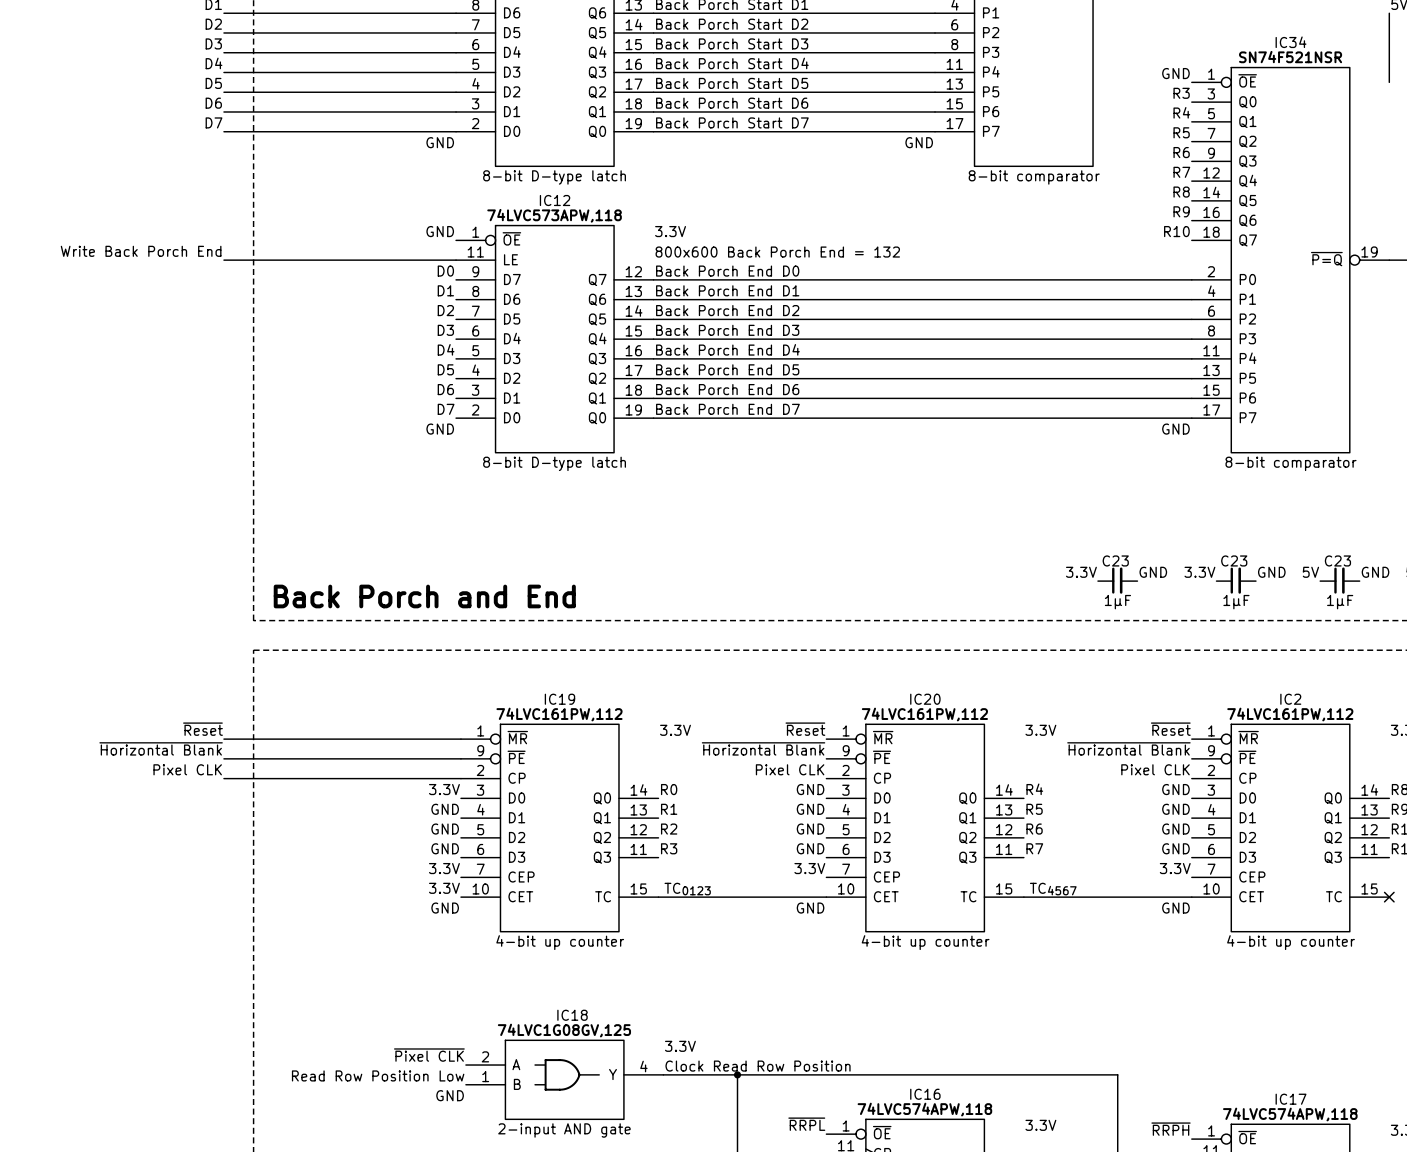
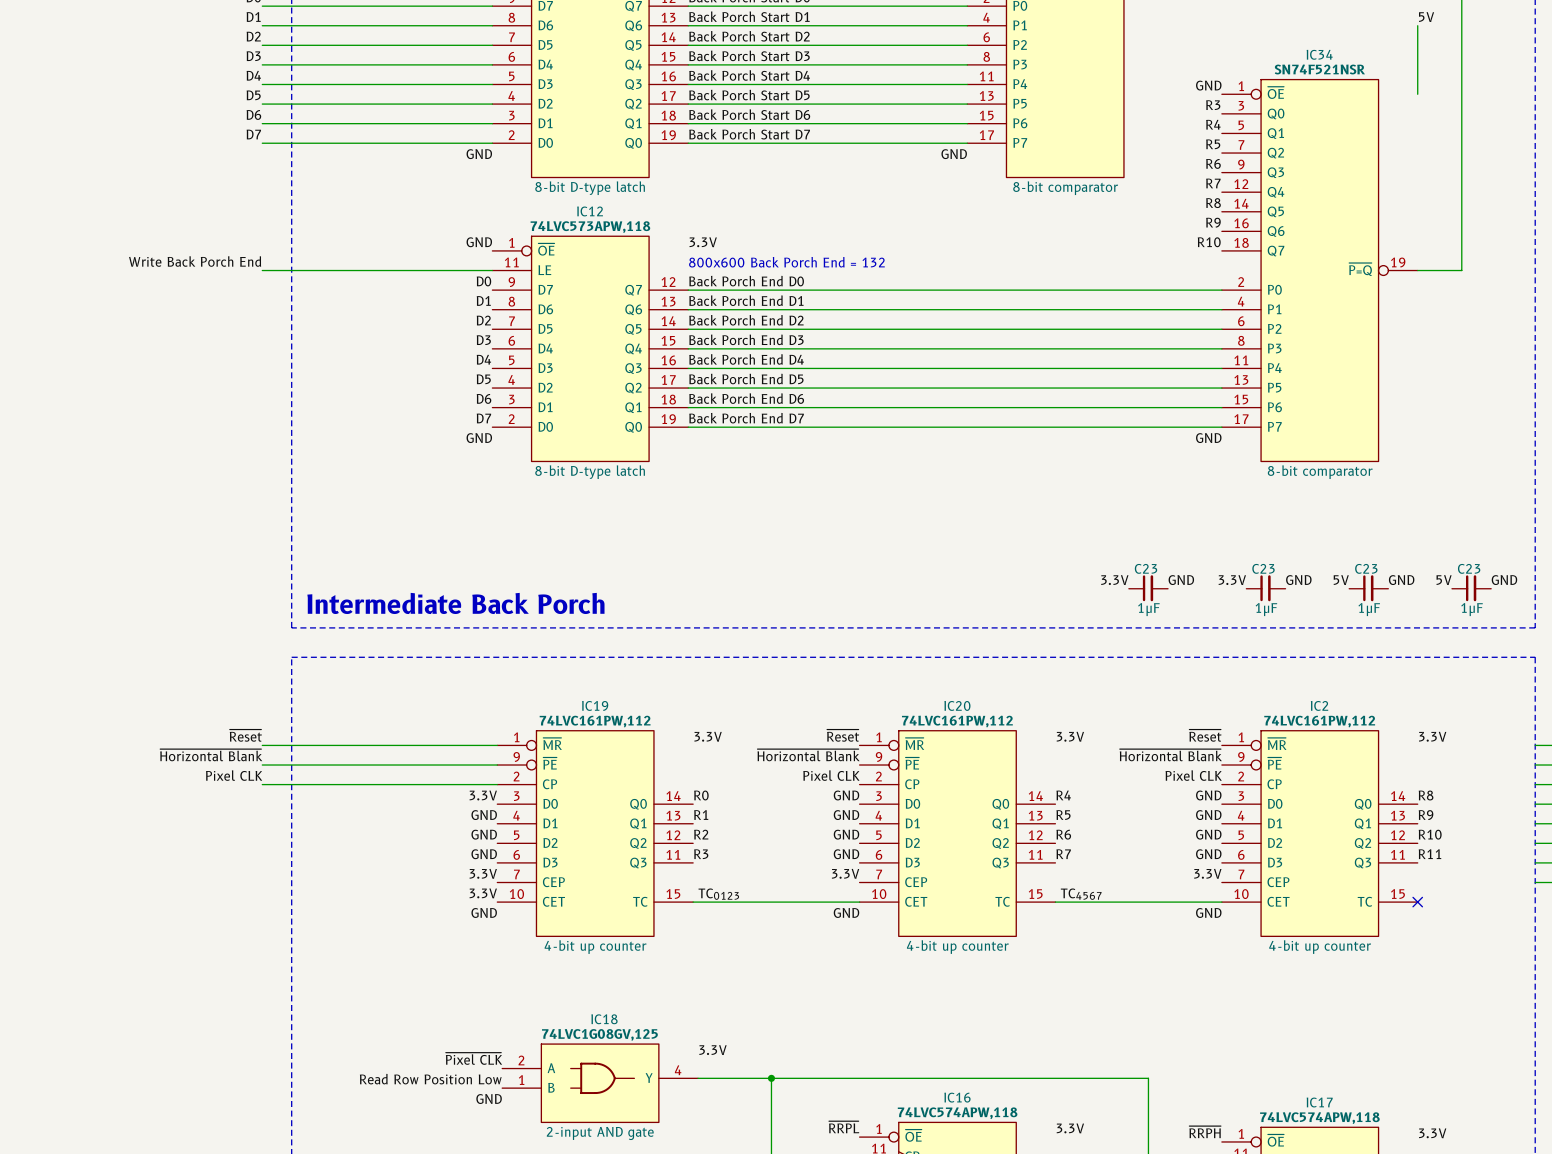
text: Back Porch and End (424, 596) -> Intermediate Back Porch (455, 603)
label: Clock Read Row Position (758, 1066) -> none

